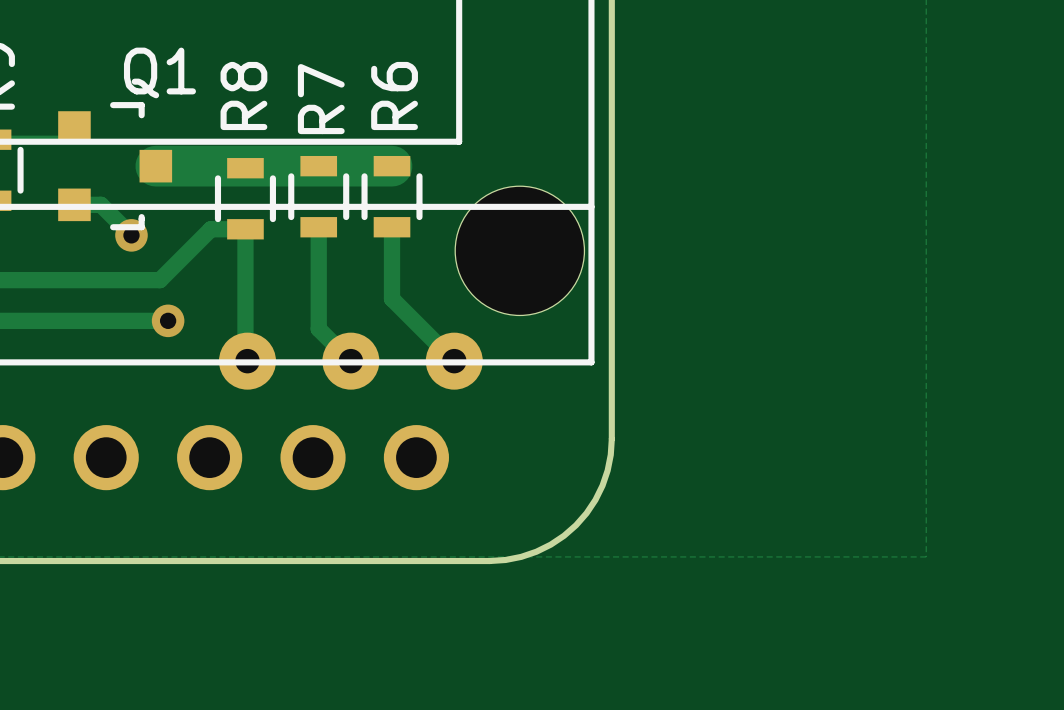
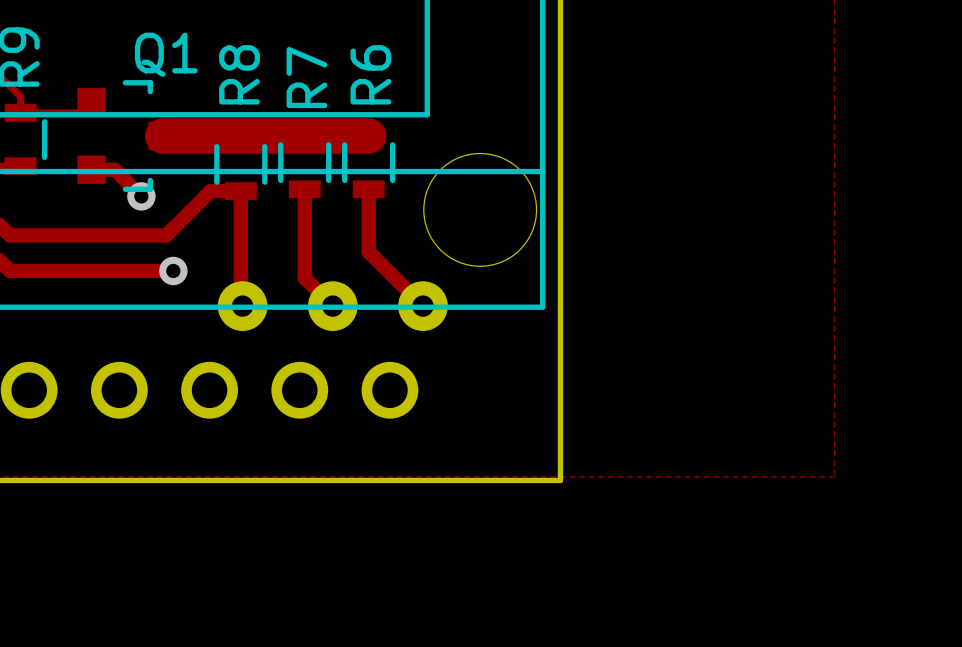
board edge: (611, 438) (610, 454) (602, 485) (586, 513) (576, 525) (564, 535) (536, 551) (505, 559) (489, 561) -> (560, 373) (560, 480) (453, 480)

